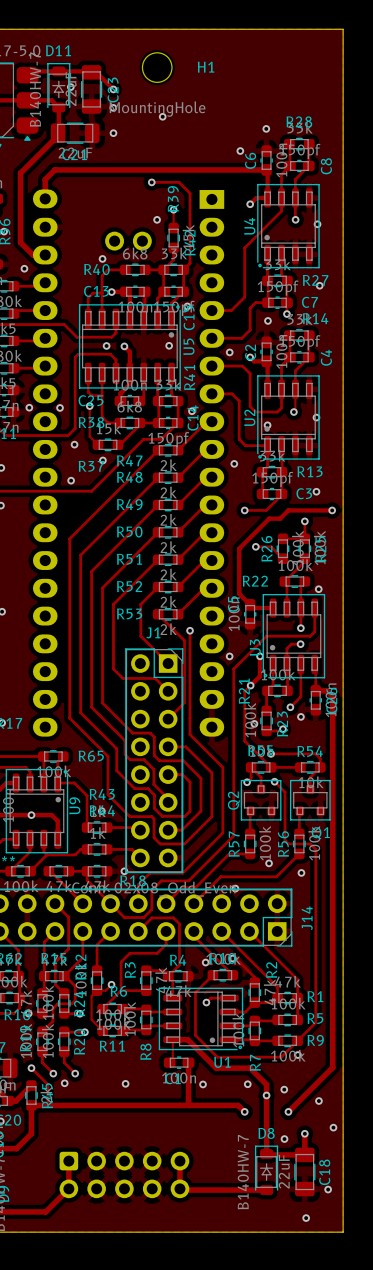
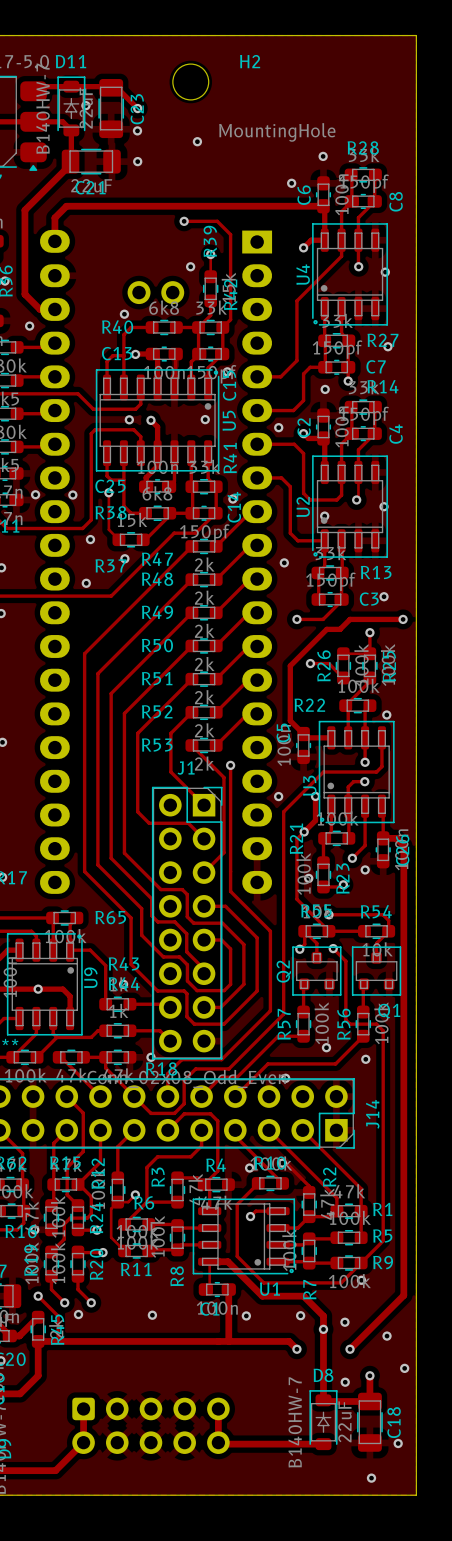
H1 name: H1 (206, 67) -> H2 (250, 61)
H1 value position: MountingHole (157, 109) -> MountingHole (277, 132)

